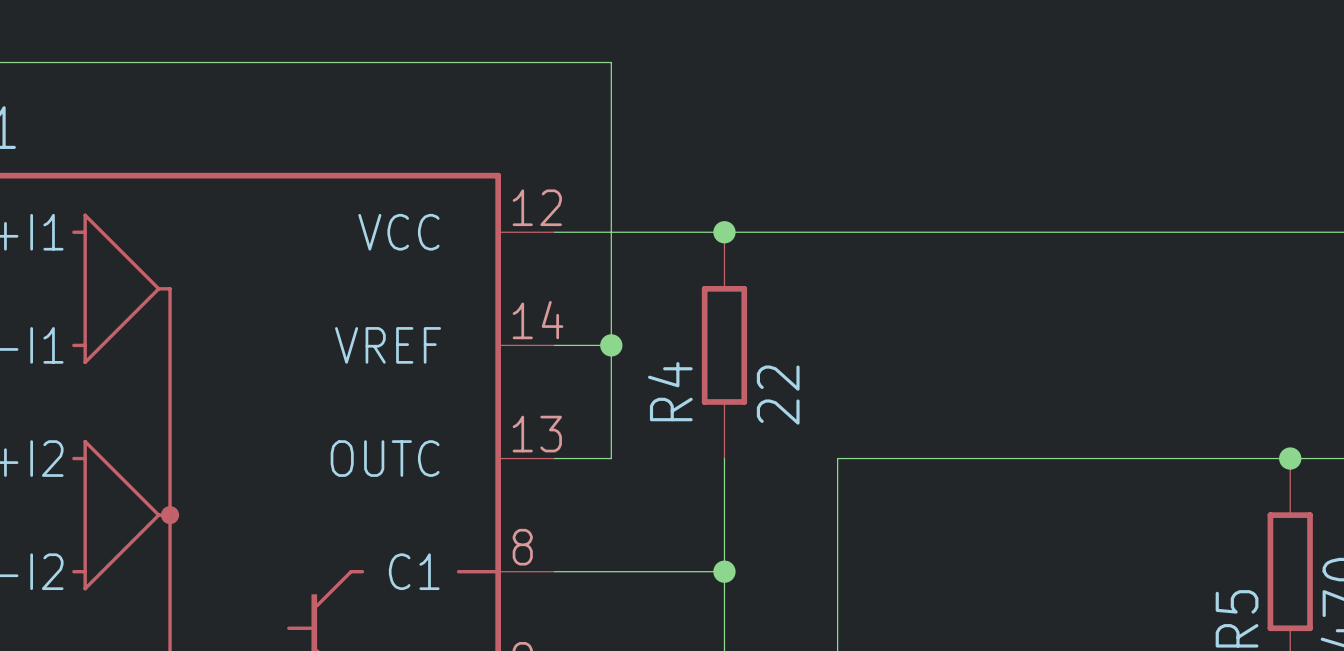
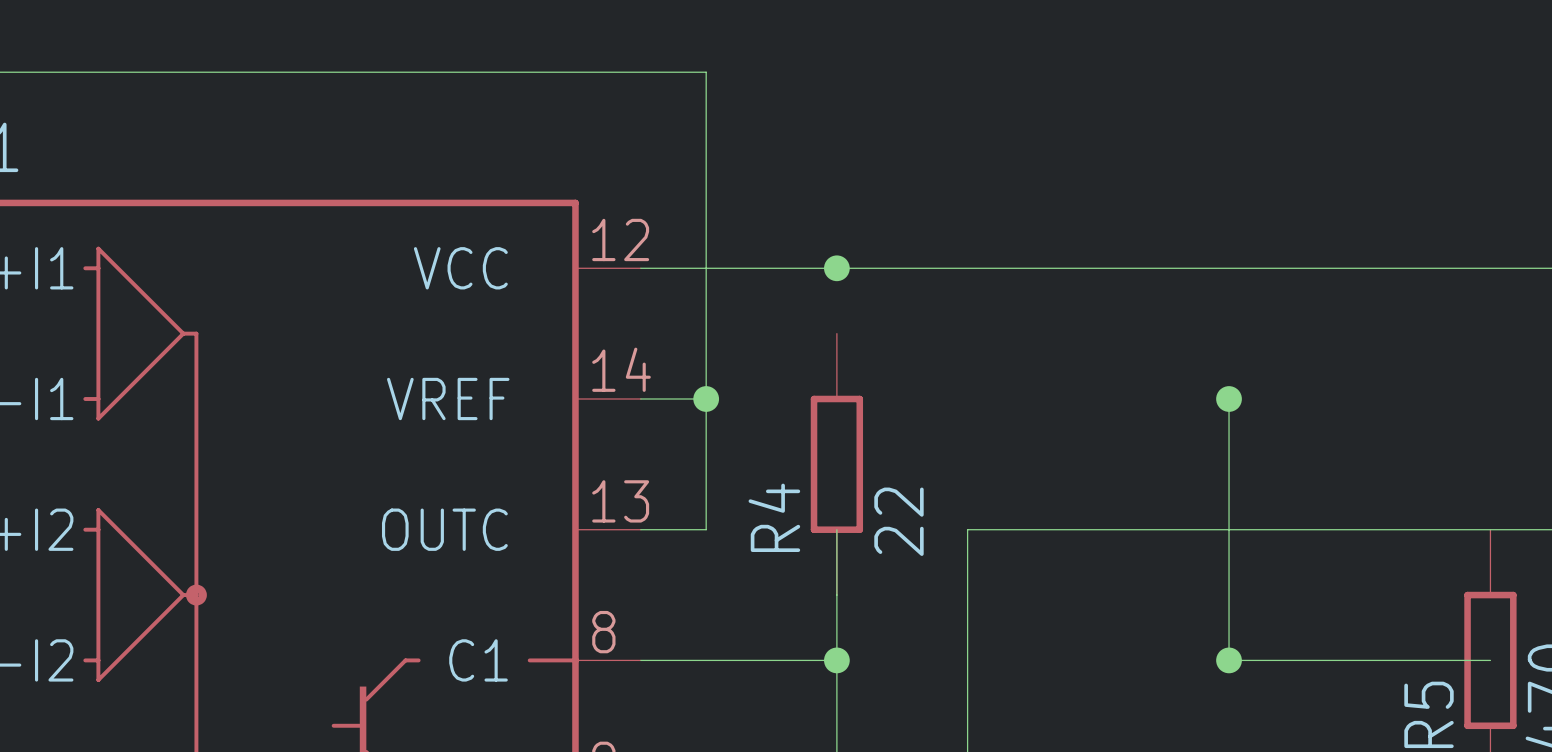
R4 position: (724, 345) -> (836, 464)
wire: none -> (1229, 398) (1229, 660) (1490, 660)
junction: none -> (1229, 398)
junction: (1290, 458) -> none
junction: none -> (1229, 660)

